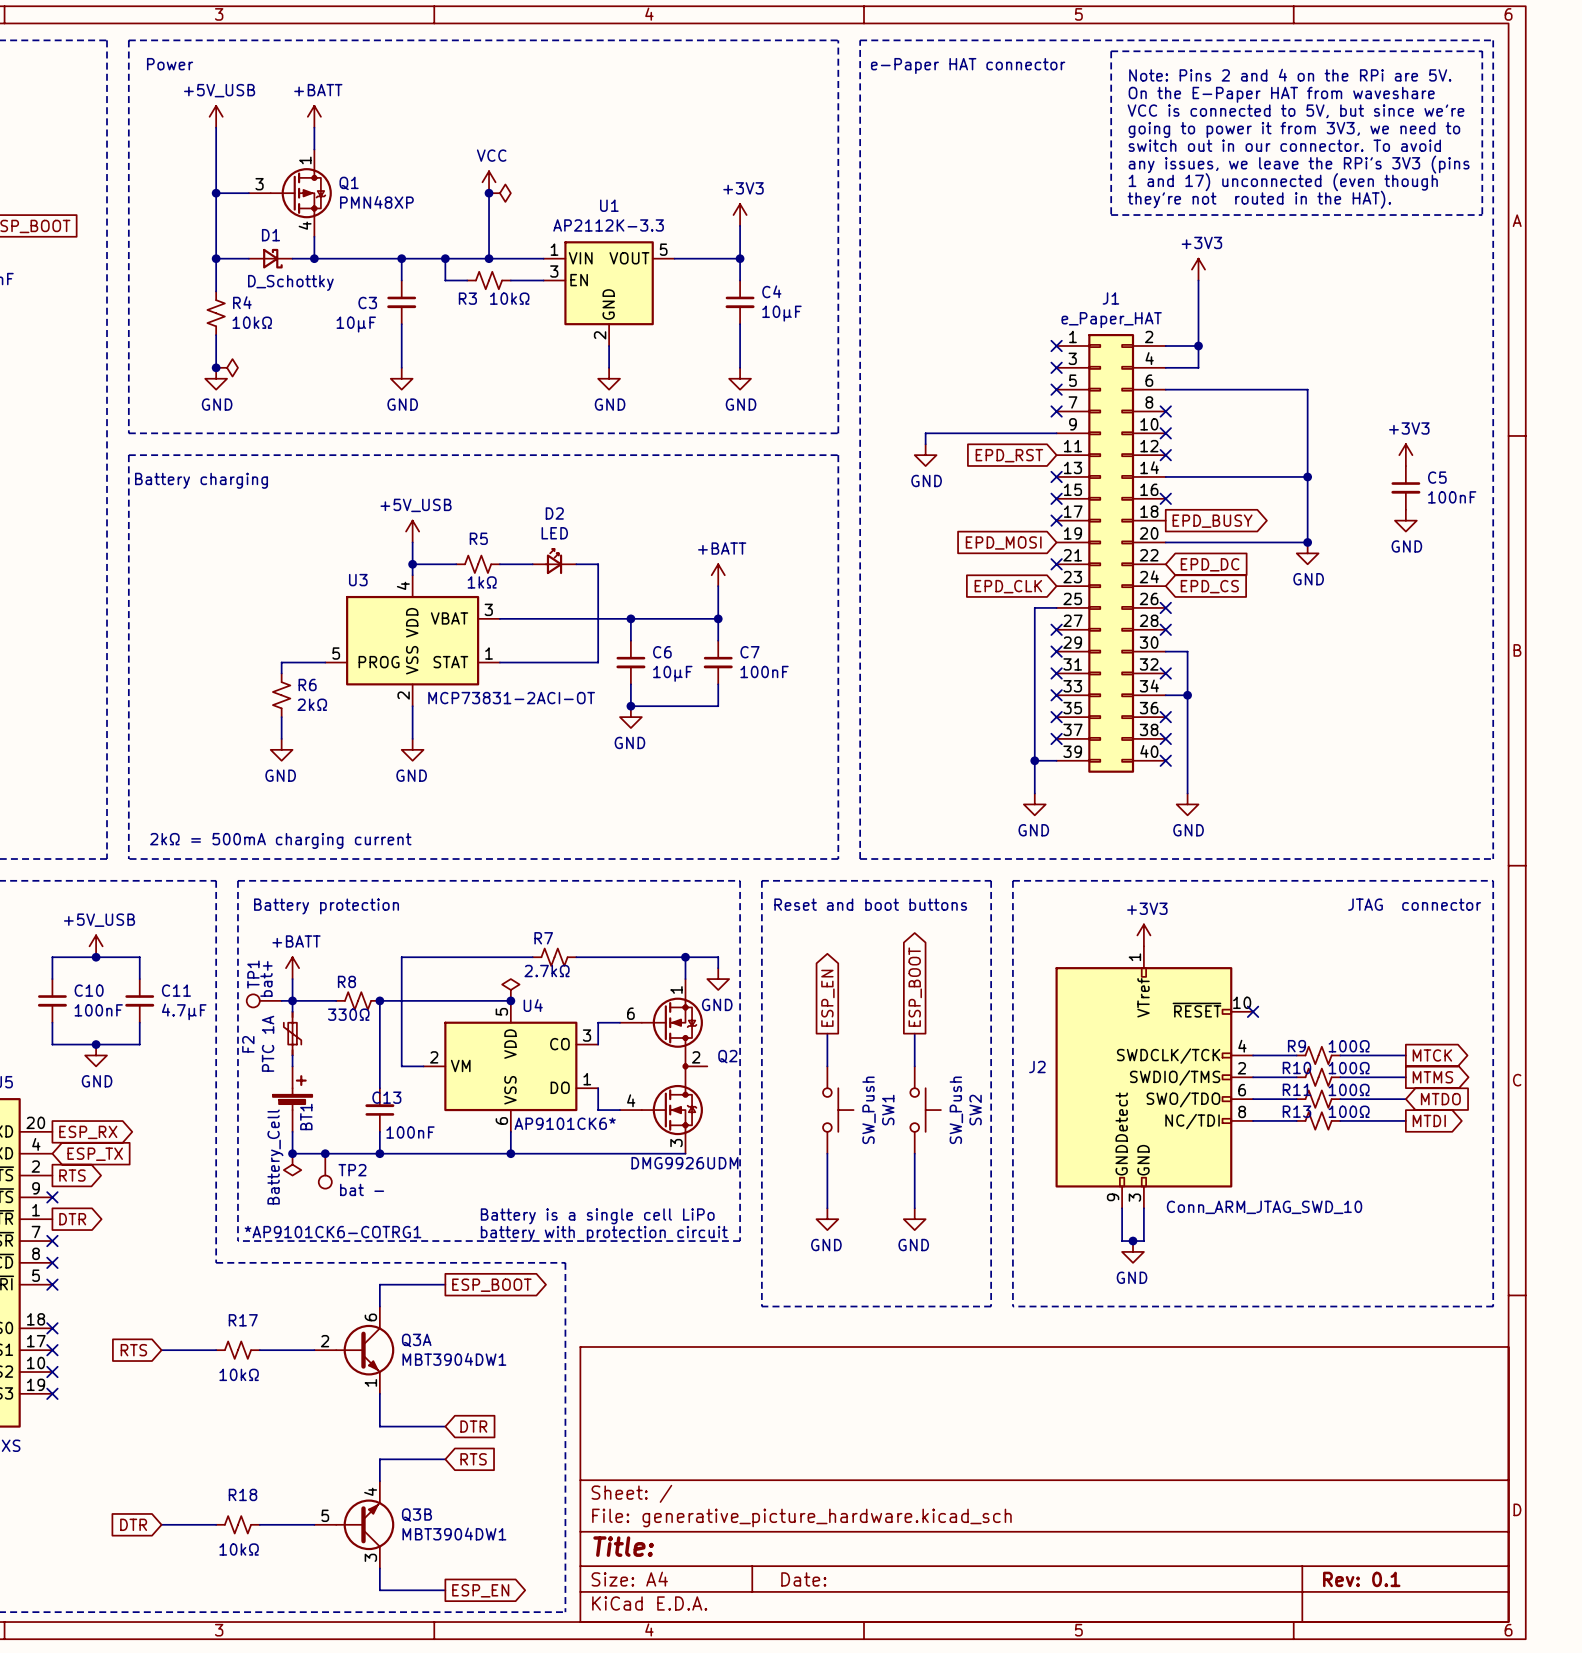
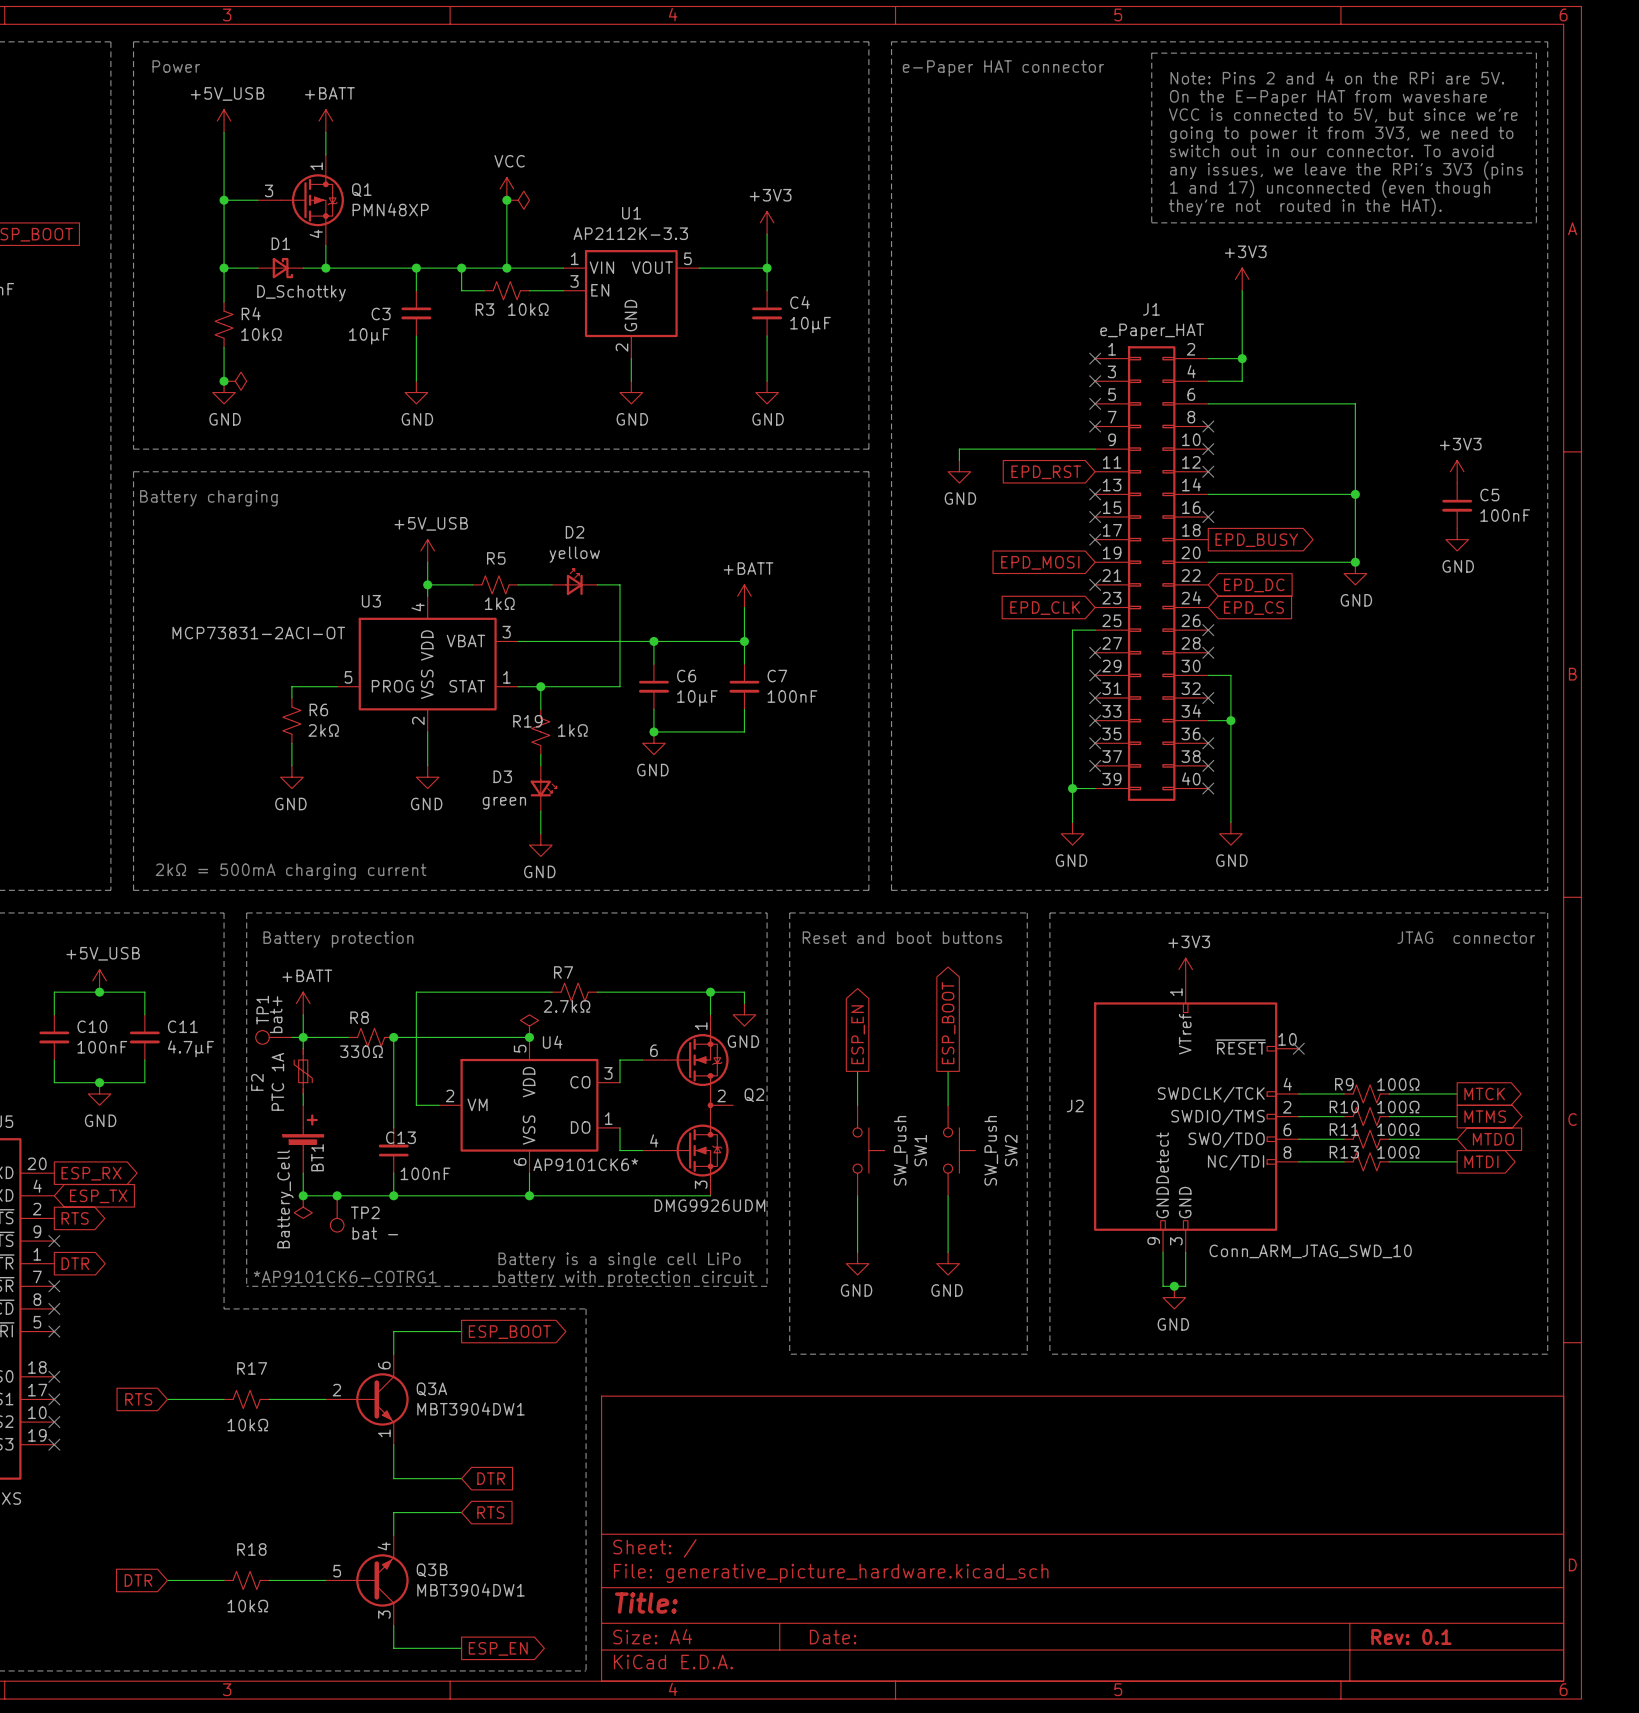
D2 value: LED (554, 533) -> yellow (574, 554)
wire: none -> (540, 686) (540, 709)
junction: none -> (540, 686)
U3 value position: MCP73831-2ACI-OT (511, 698) -> MCP73831-2ACI-OT (258, 633)
R19: none -> 1kΩ (540, 731)
wire: none -> (540, 754) (540, 765)
D3: none -> green (543, 788)
wire: none -> (540, 811) (540, 833)
power symbol: none -> GND (540, 845)

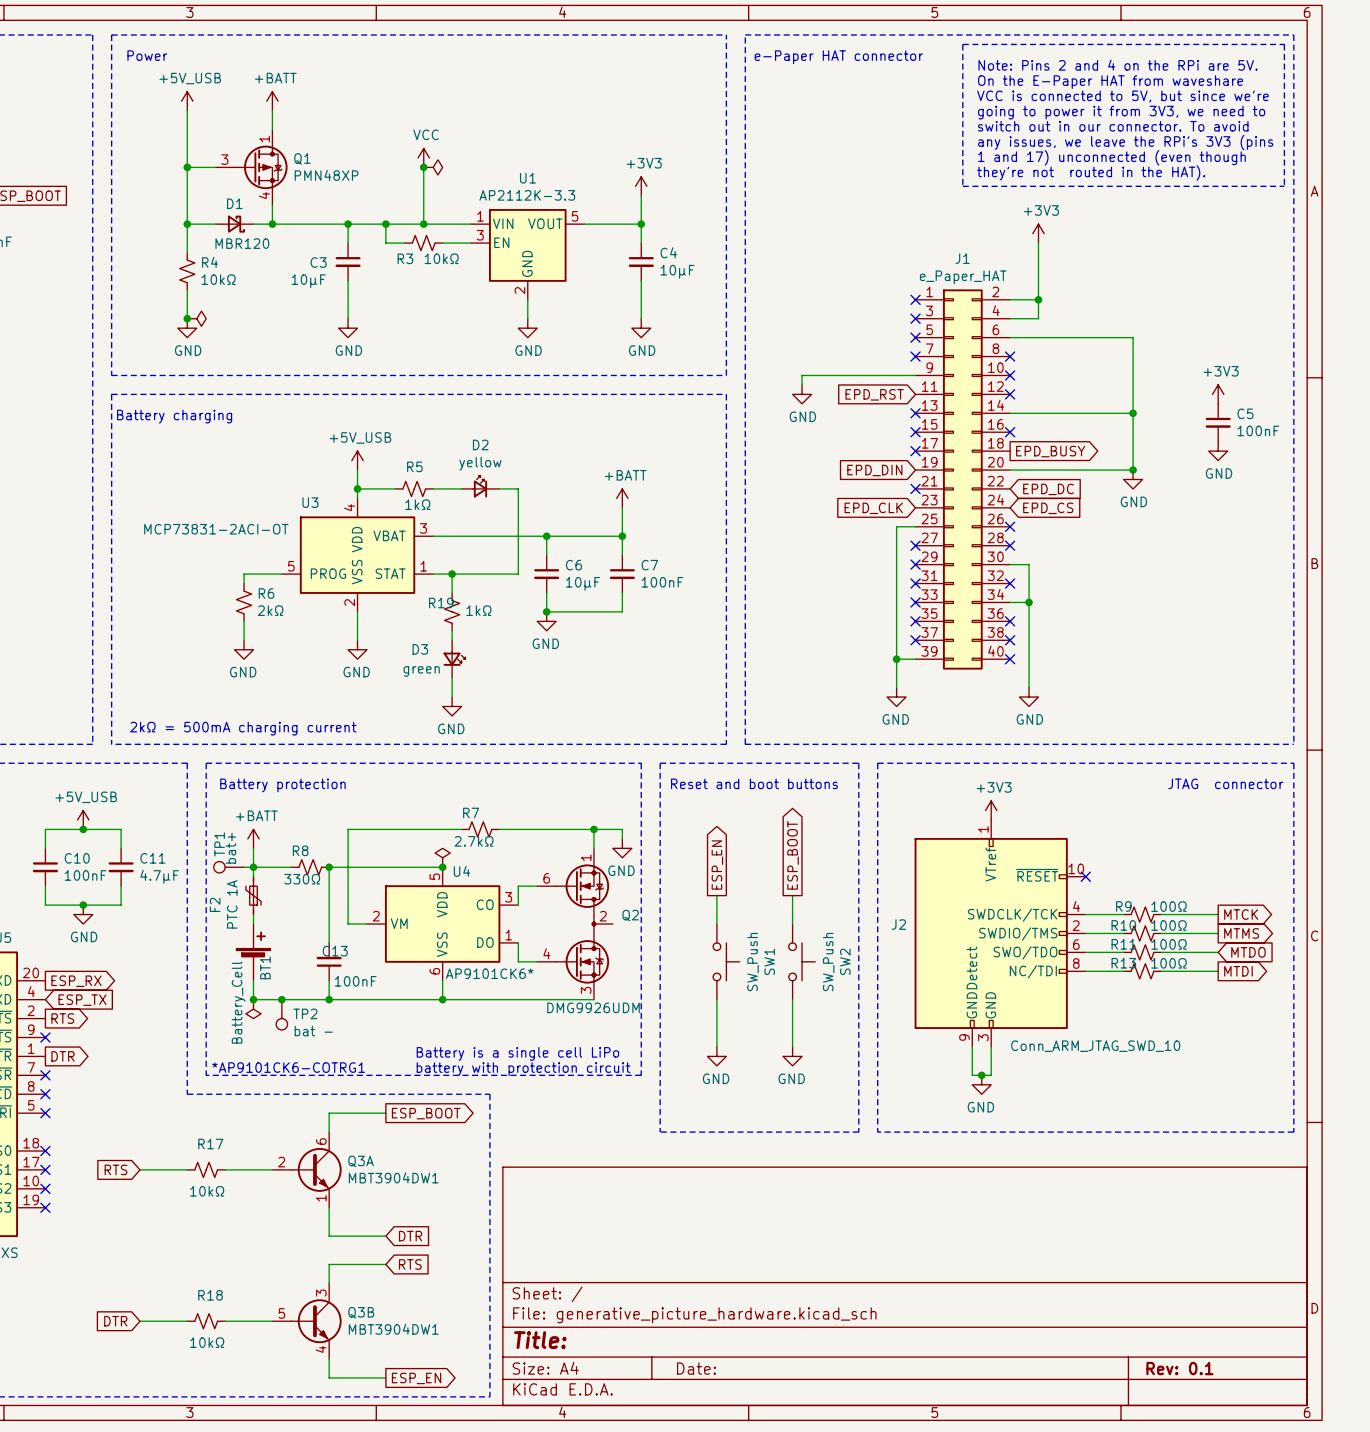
D1 value: D_Schottky (301, 293) -> MBR120 (242, 243)
global label: EPD_MOSI (1040, 562) -> EPD_DIN (874, 470)
Q3B flip: as is (378, 1580) -> up-down (316, 1321)

